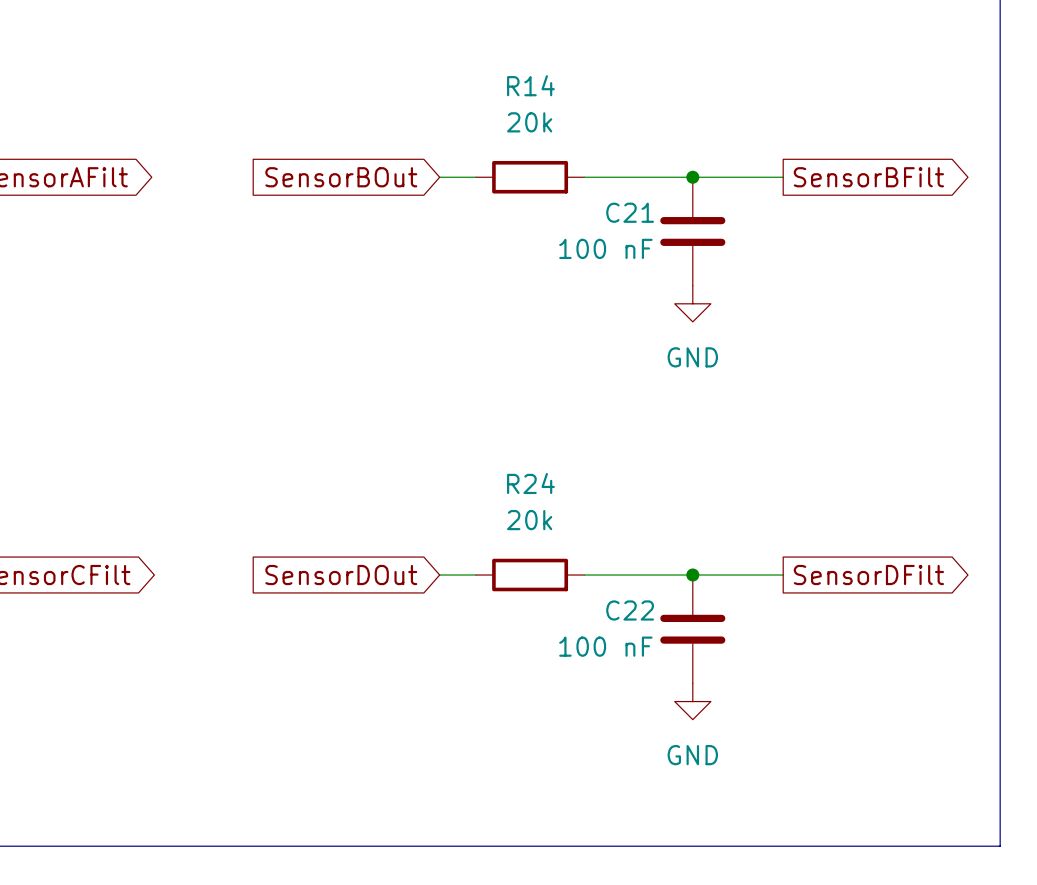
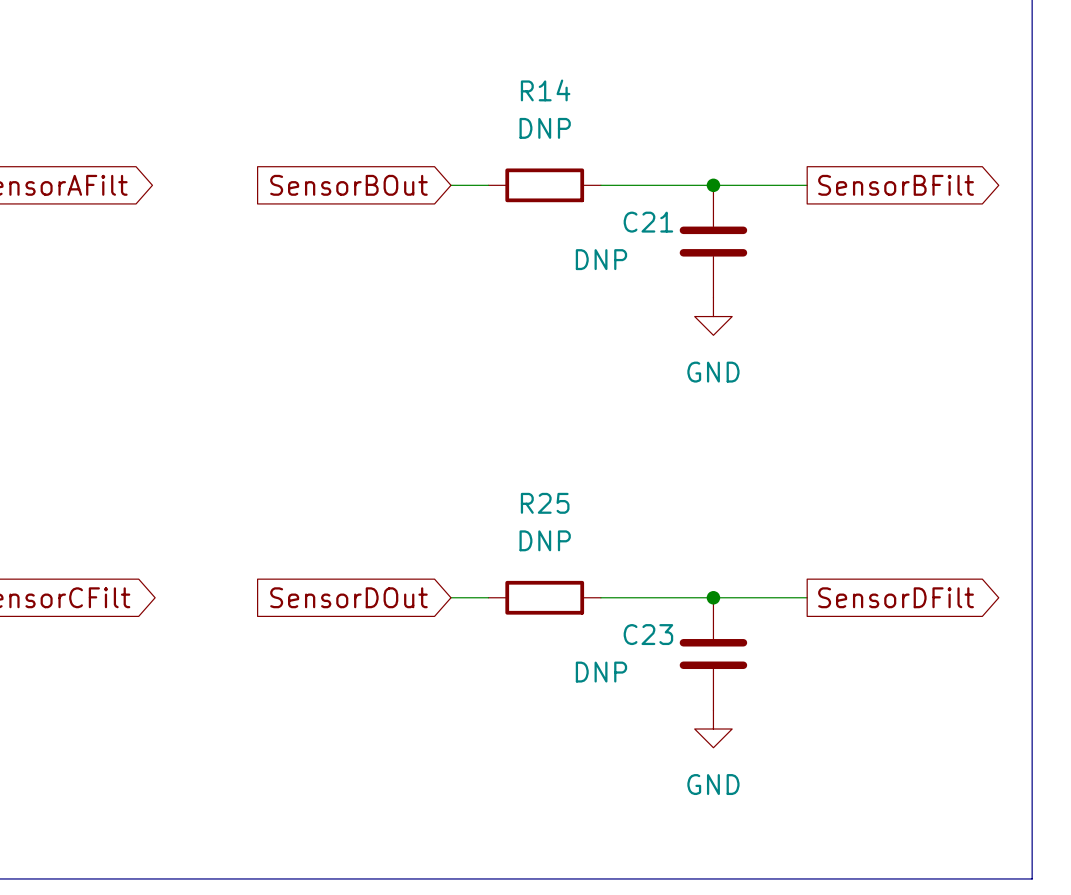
R14 value: 20k (529, 122) -> DNP (545, 128)
C21 value: 100 nF (605, 248) -> DNP (601, 259)
R24 name: R24 (530, 483) -> R25 (545, 503)
R24 value: 20k (529, 520) -> DNP (545, 540)
C22 name: C22 (630, 610) -> C23 (648, 634)
C22 value: 100 nF (605, 646) -> DNP (601, 672)

